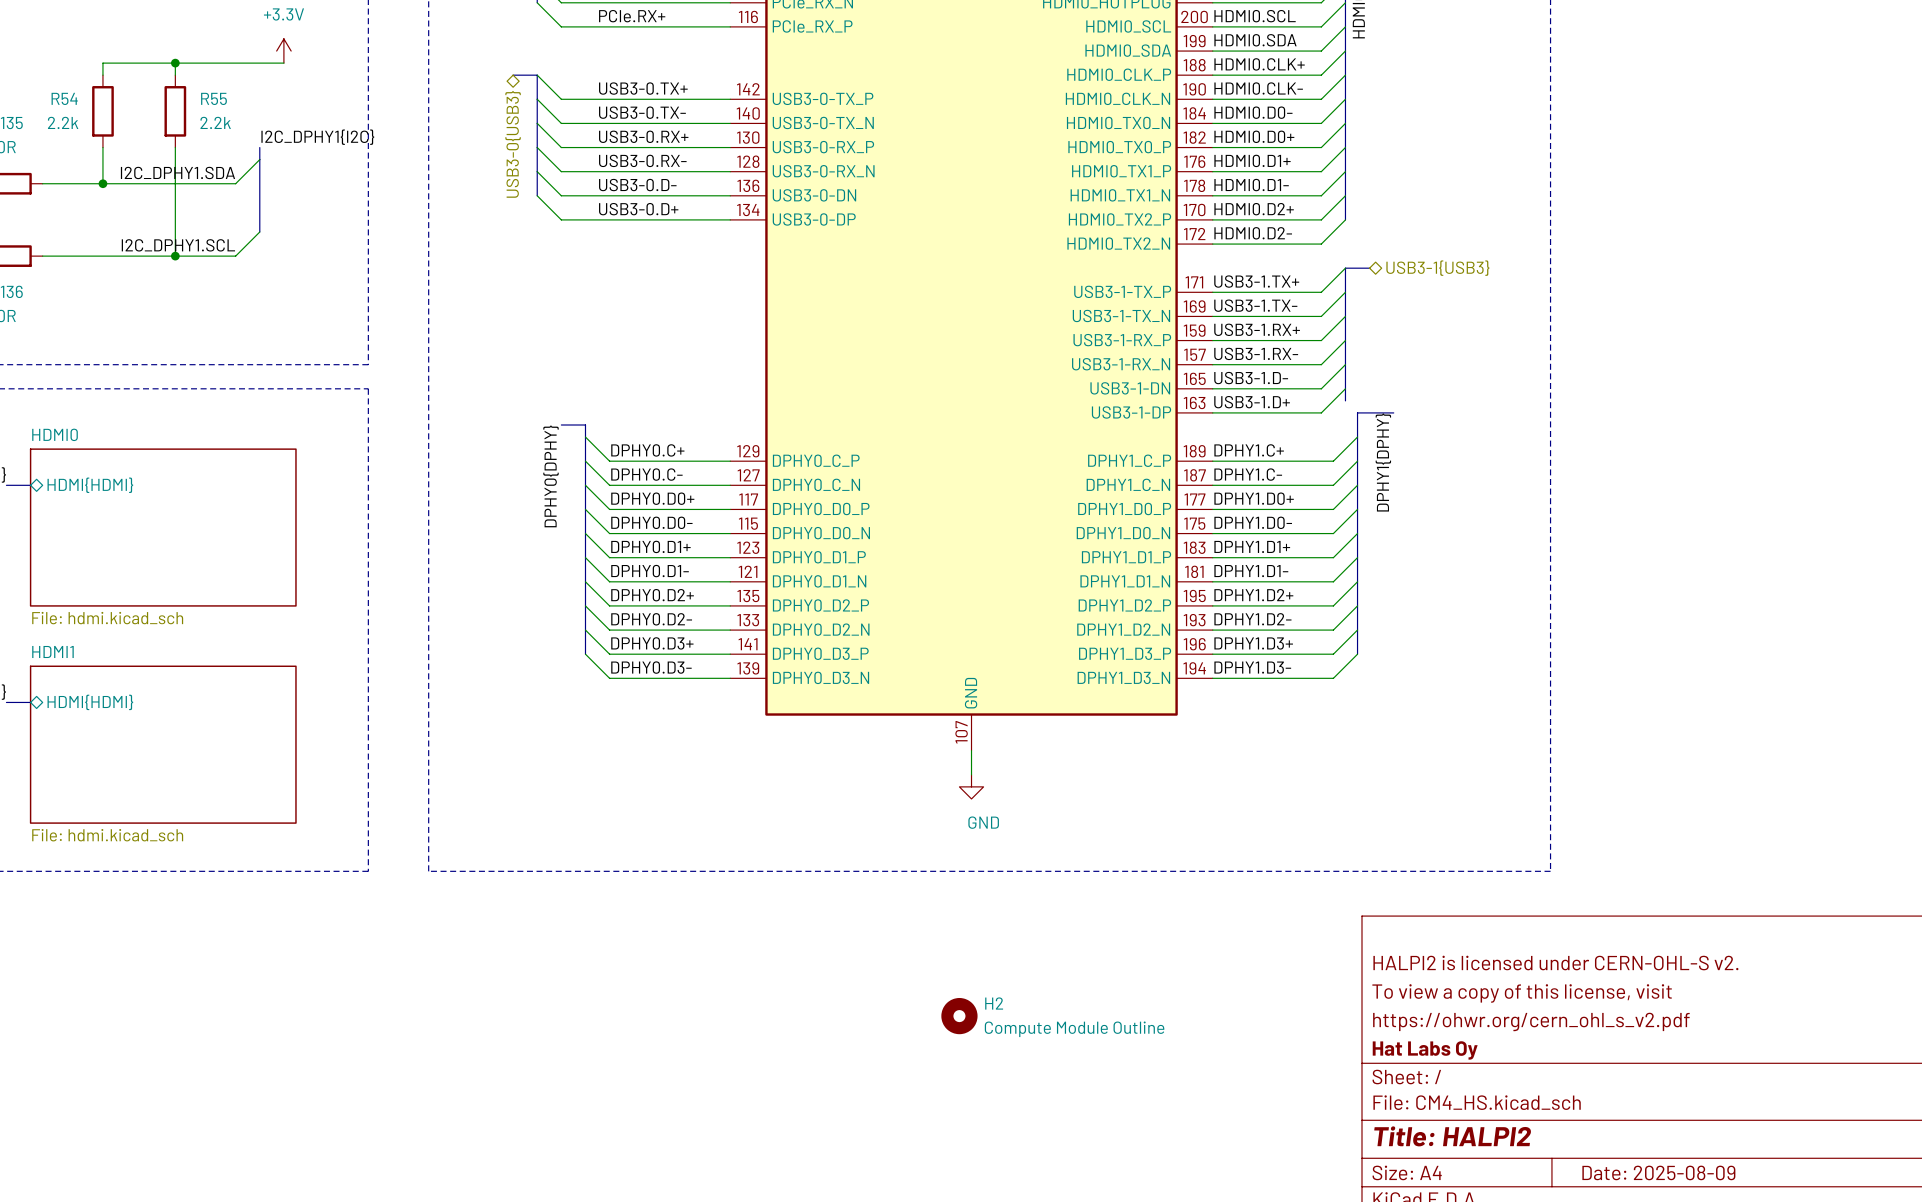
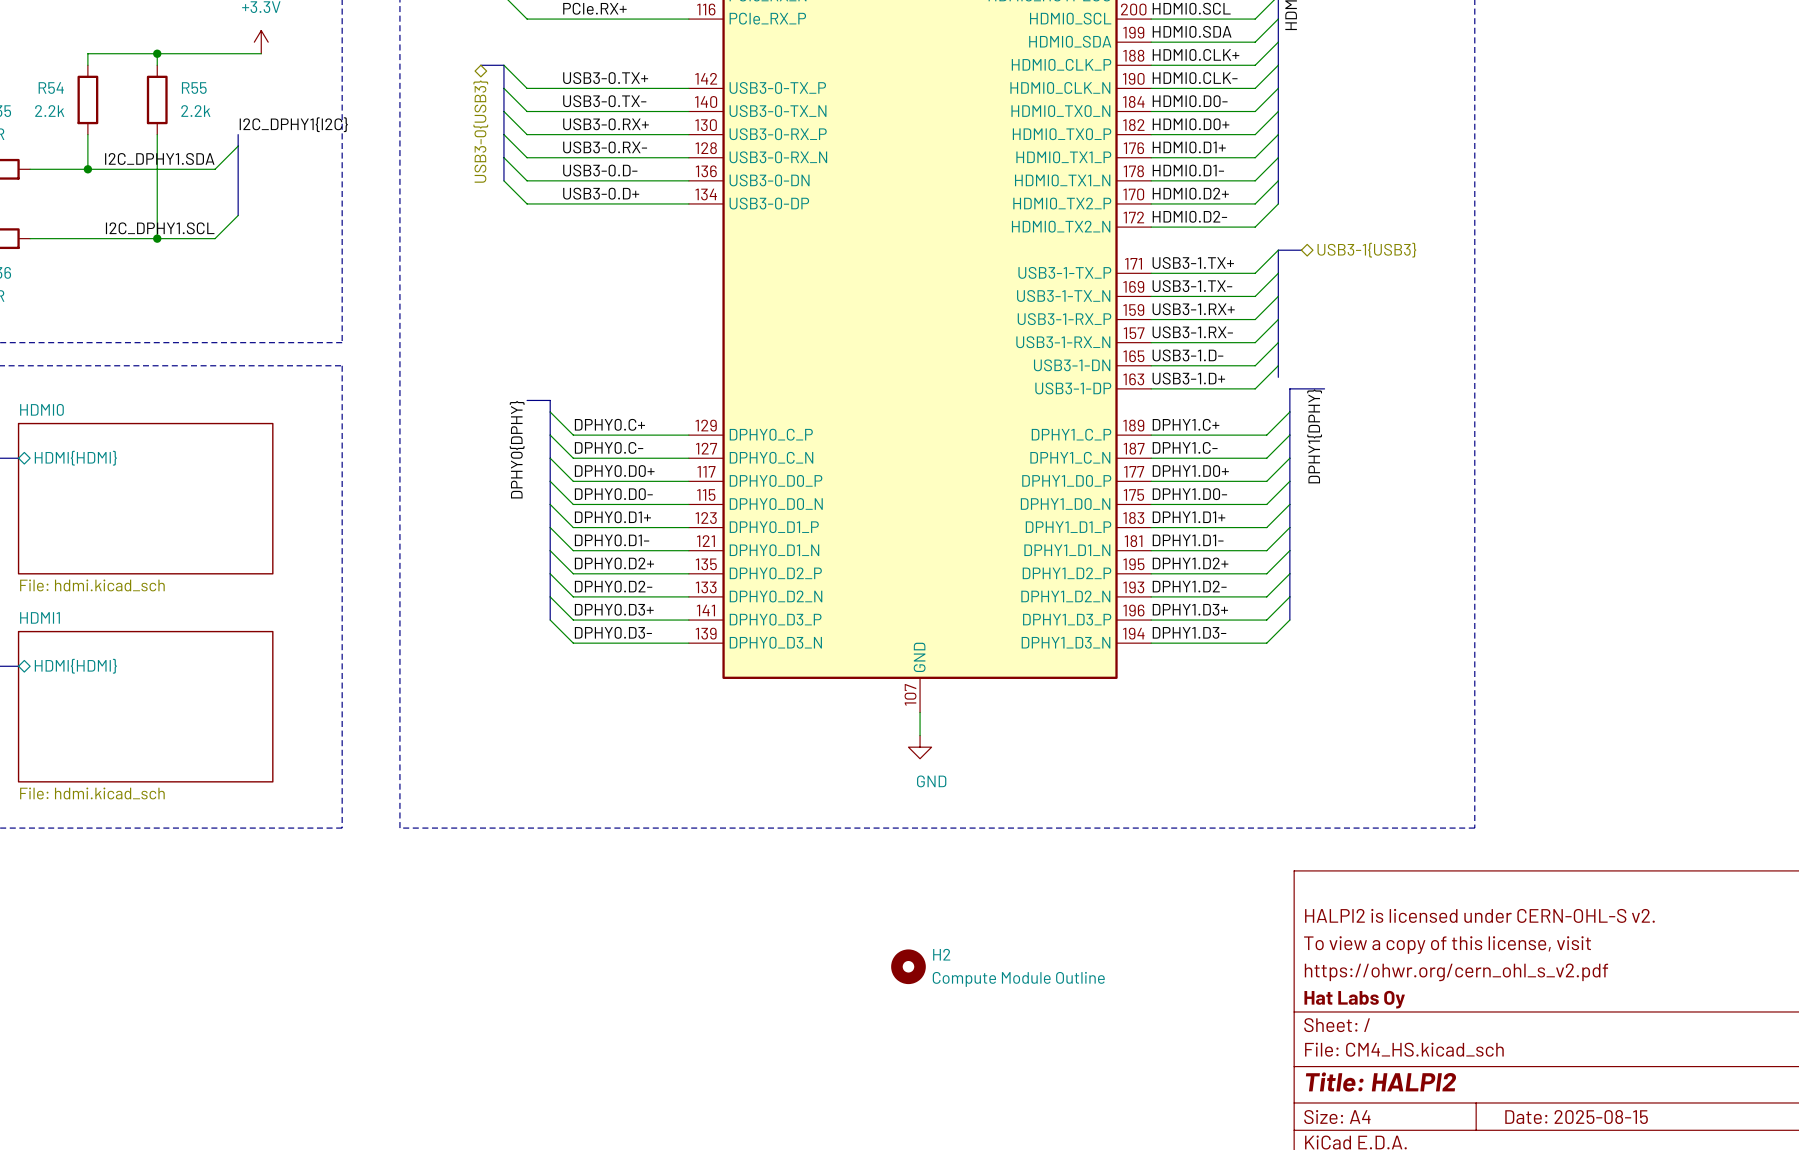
title block: Date: 2025-08-09 (1658, 1172) -> Date: 2025-08-15 (1576, 1117)

